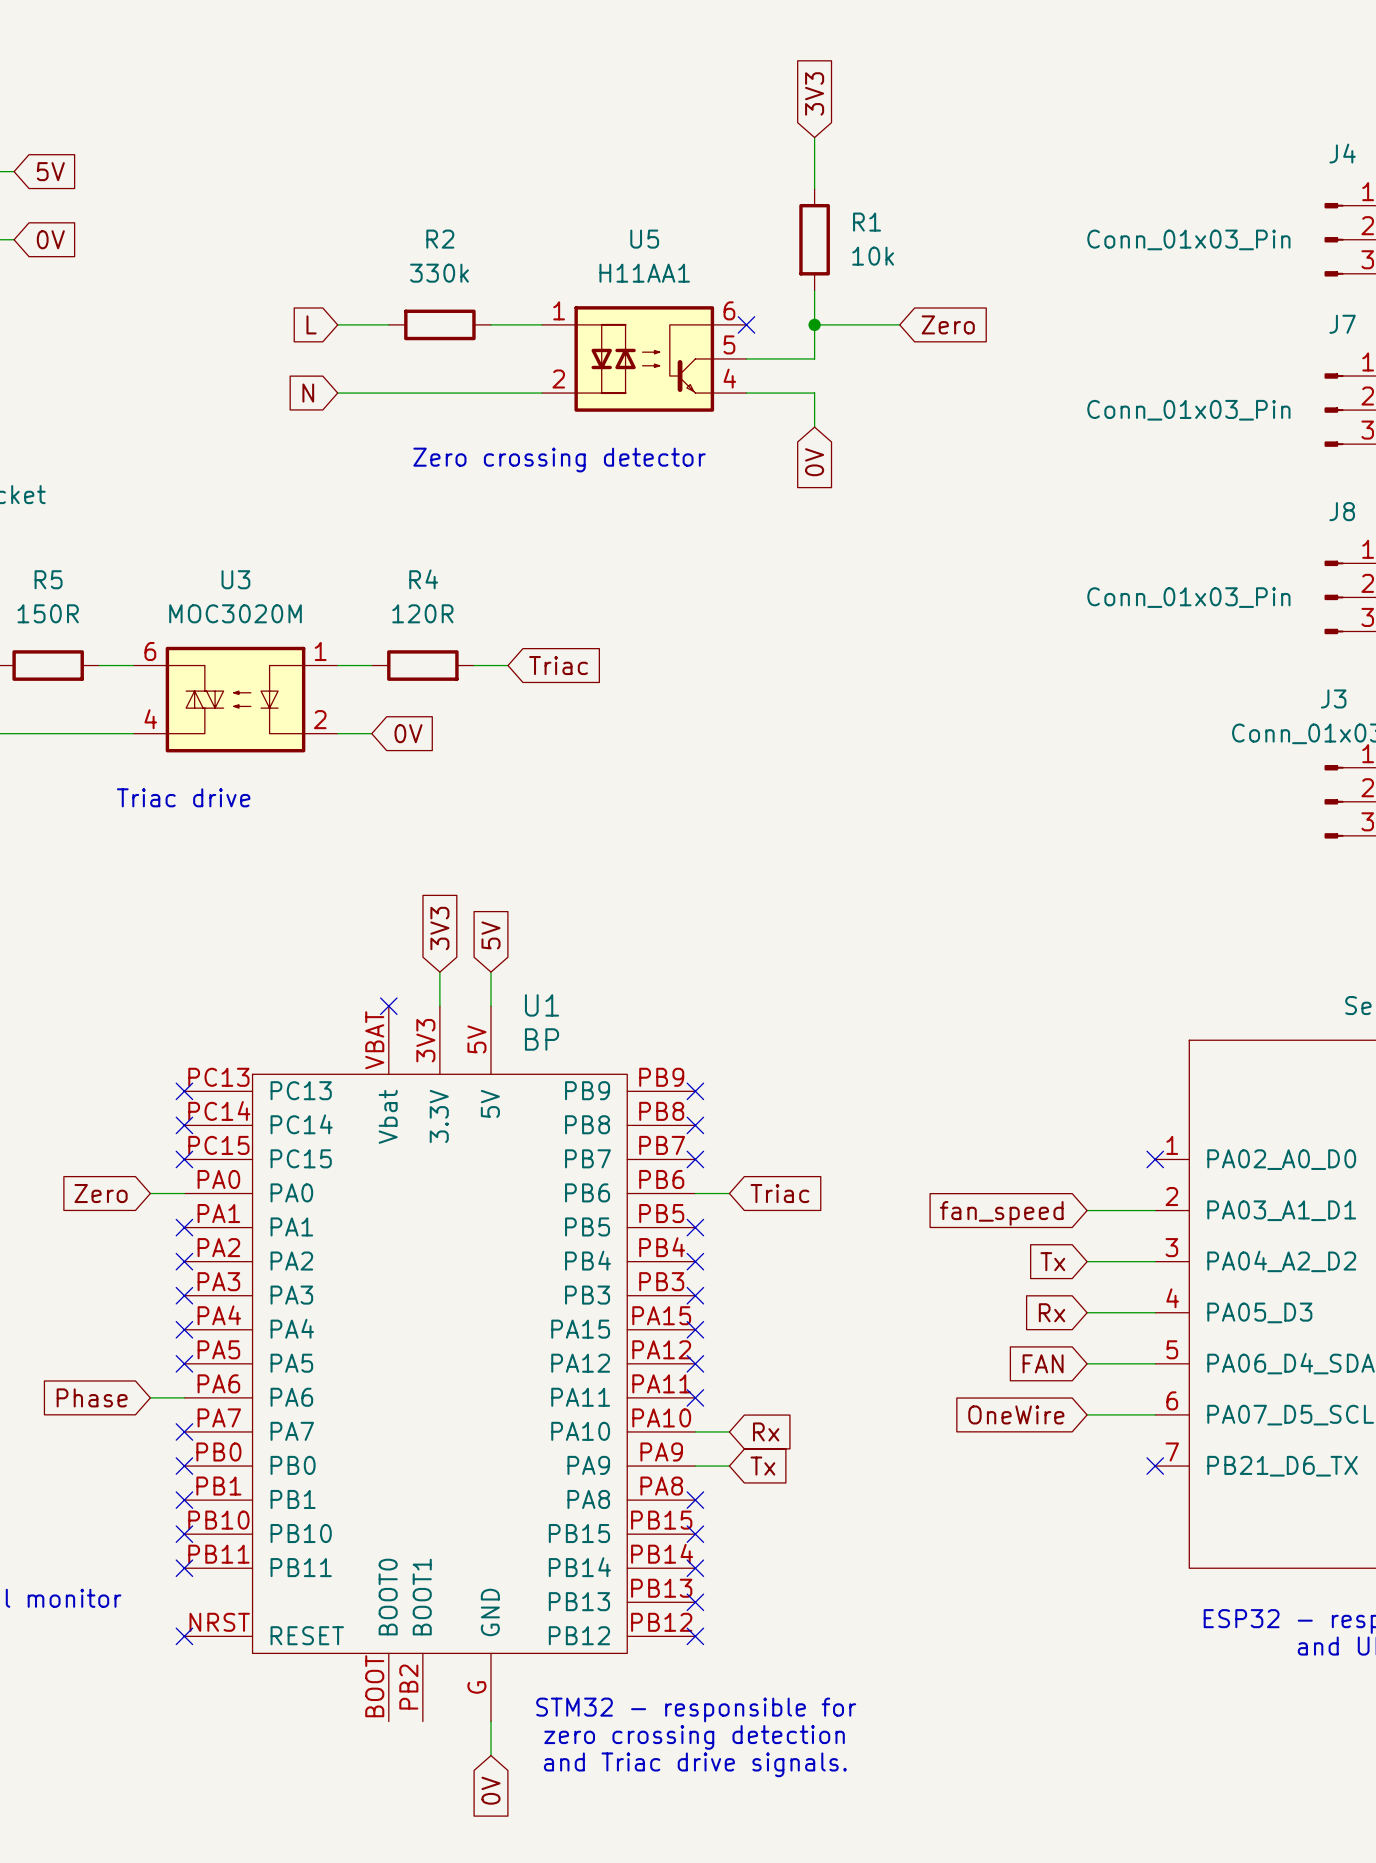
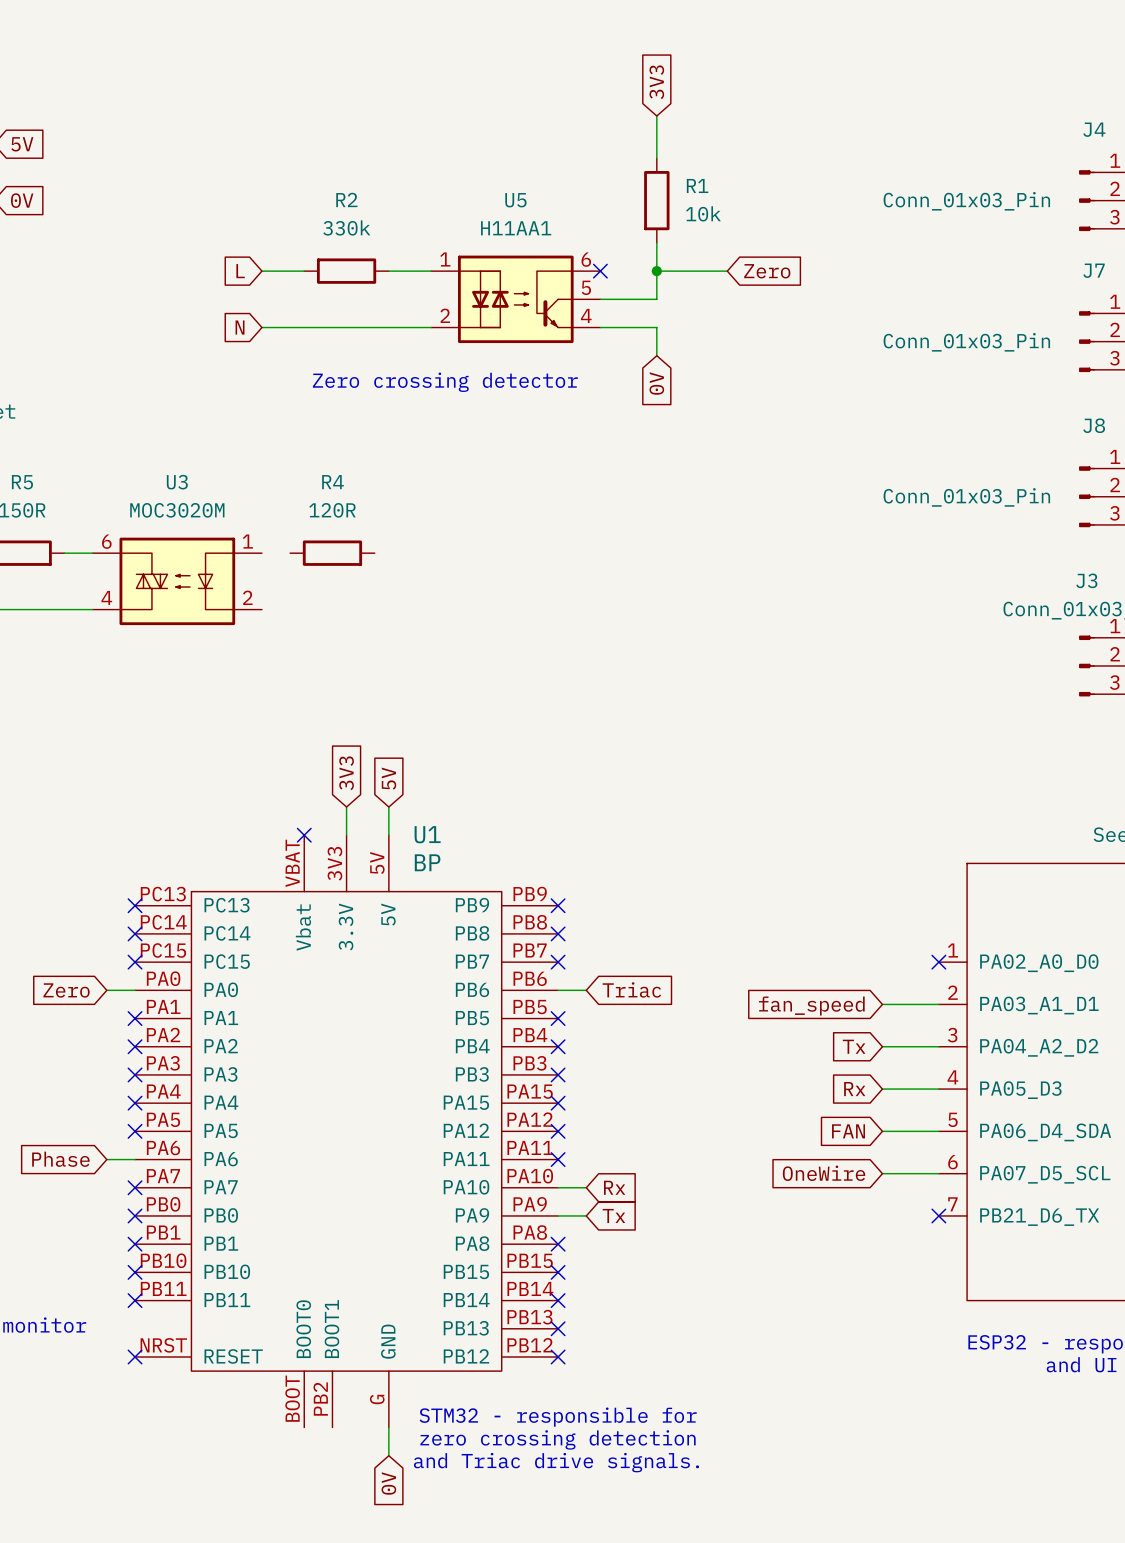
wire: (337, 665) (371, 665) -> none
wire: (473, 665) (508, 665) -> none
global label: Triac (558, 665) -> none
wire: (337, 733) (371, 733) -> none
global label: 0V (408, 733) -> none
text: Triac drive (183, 797) -> none

